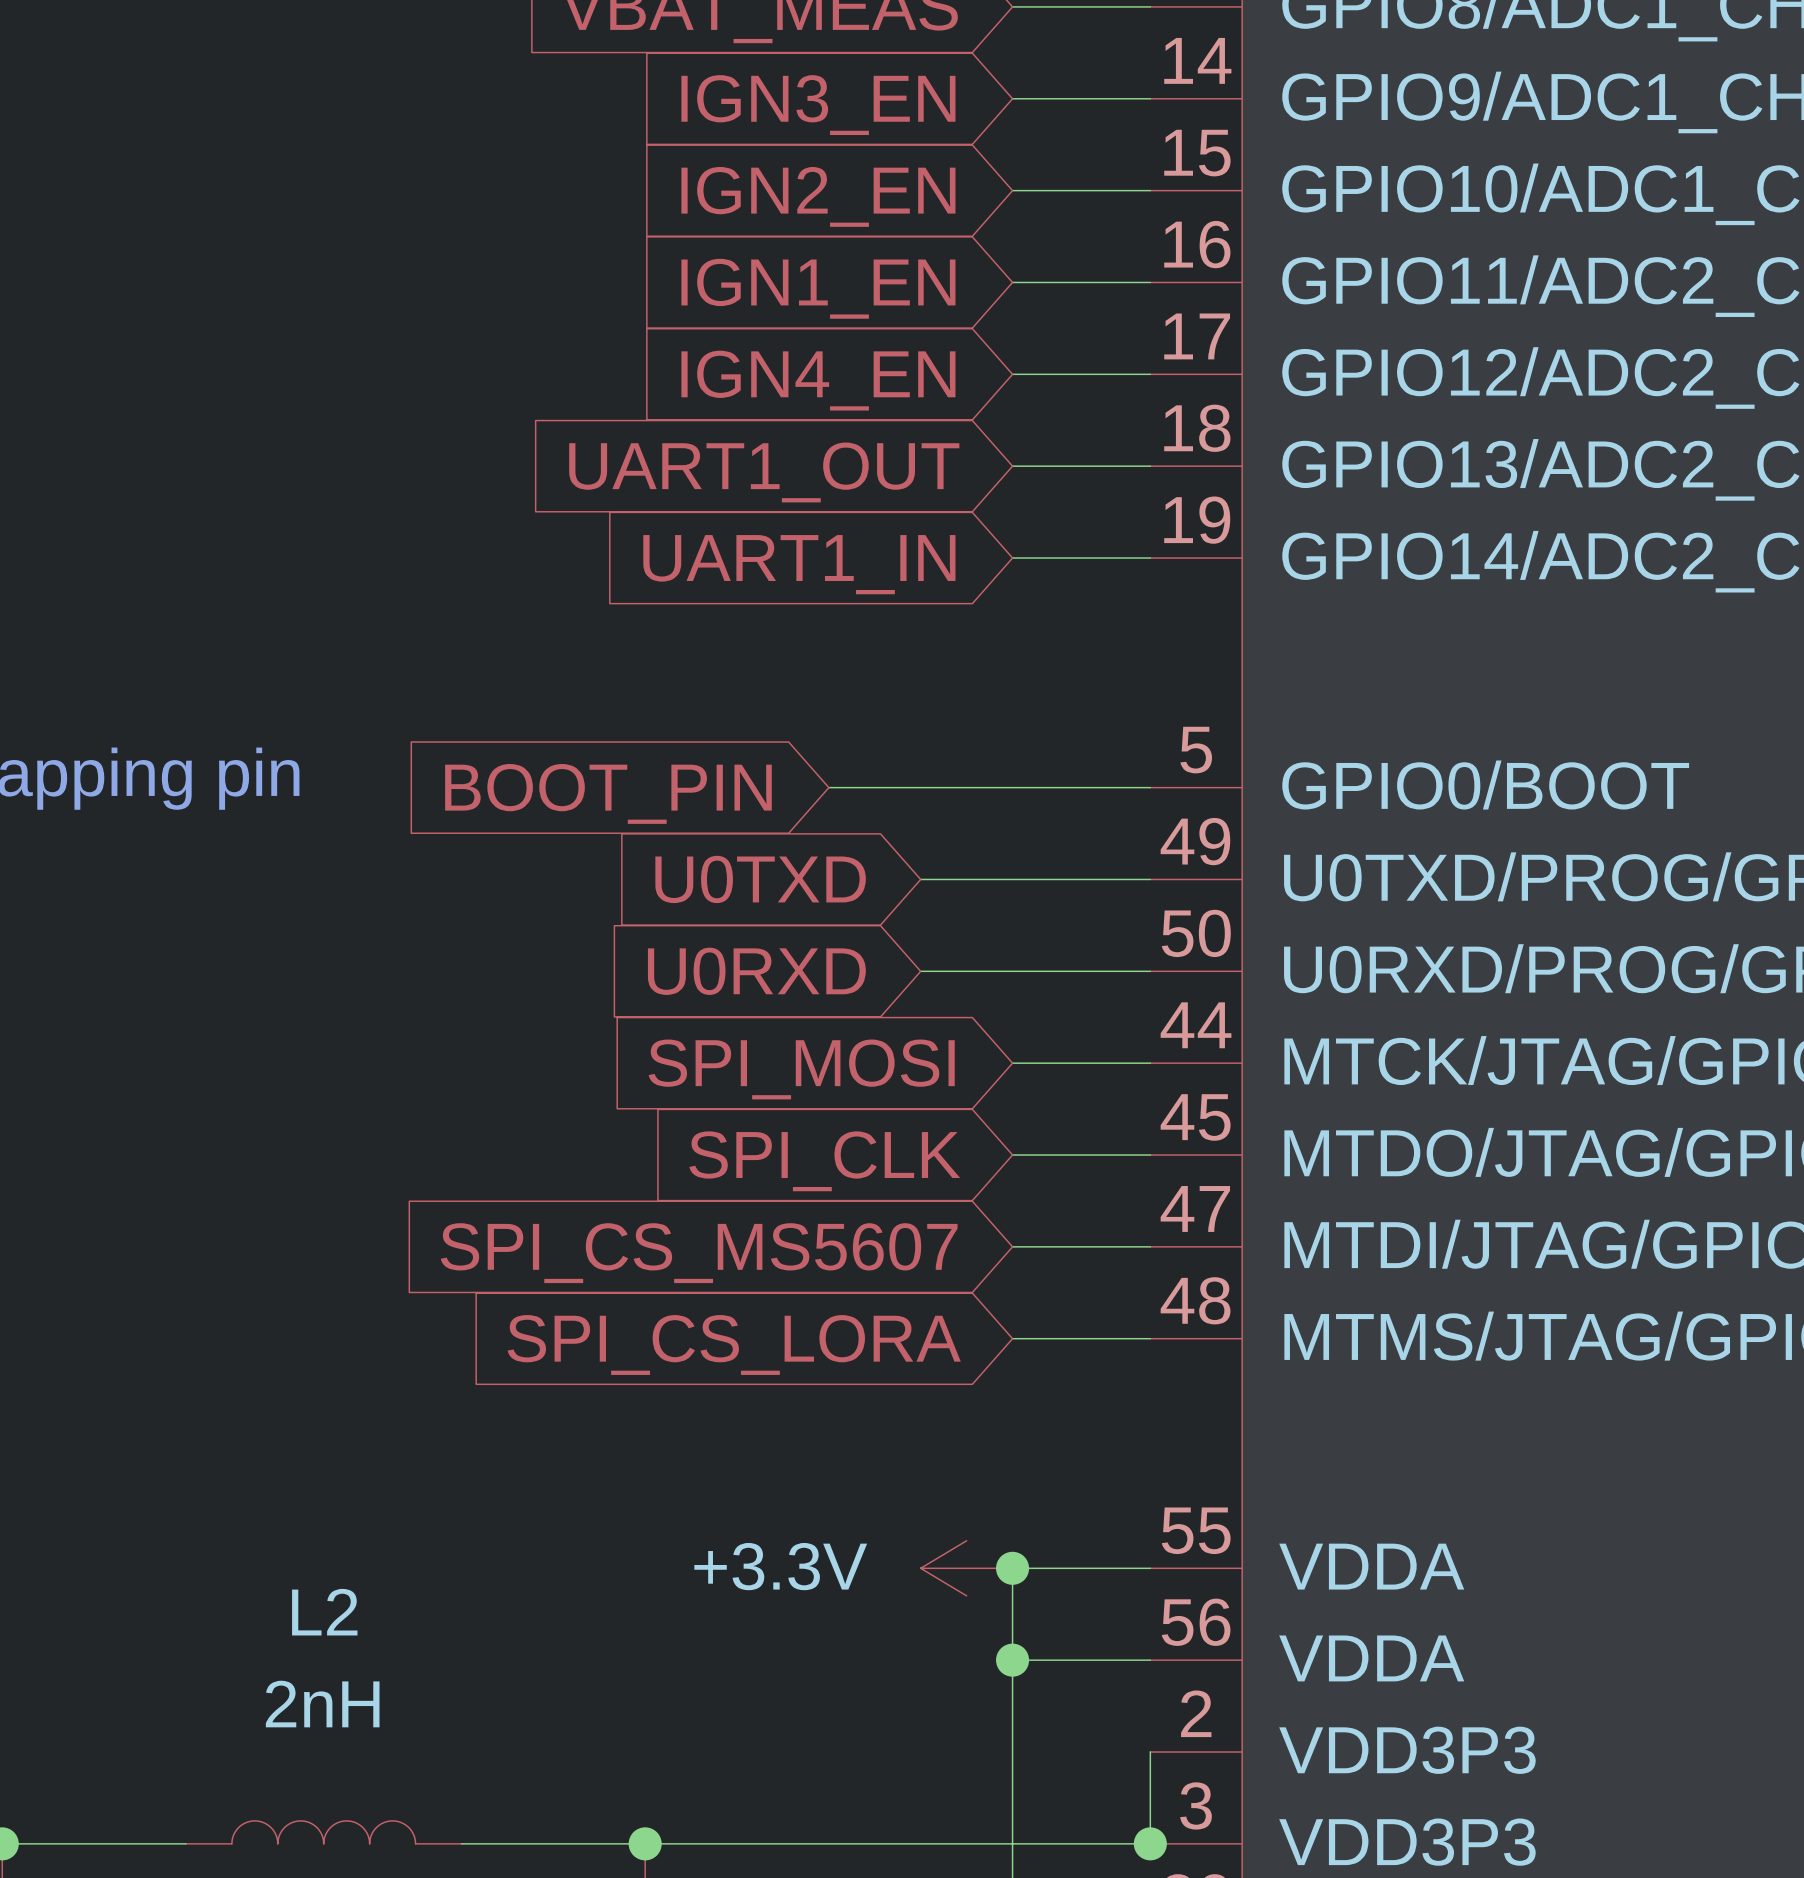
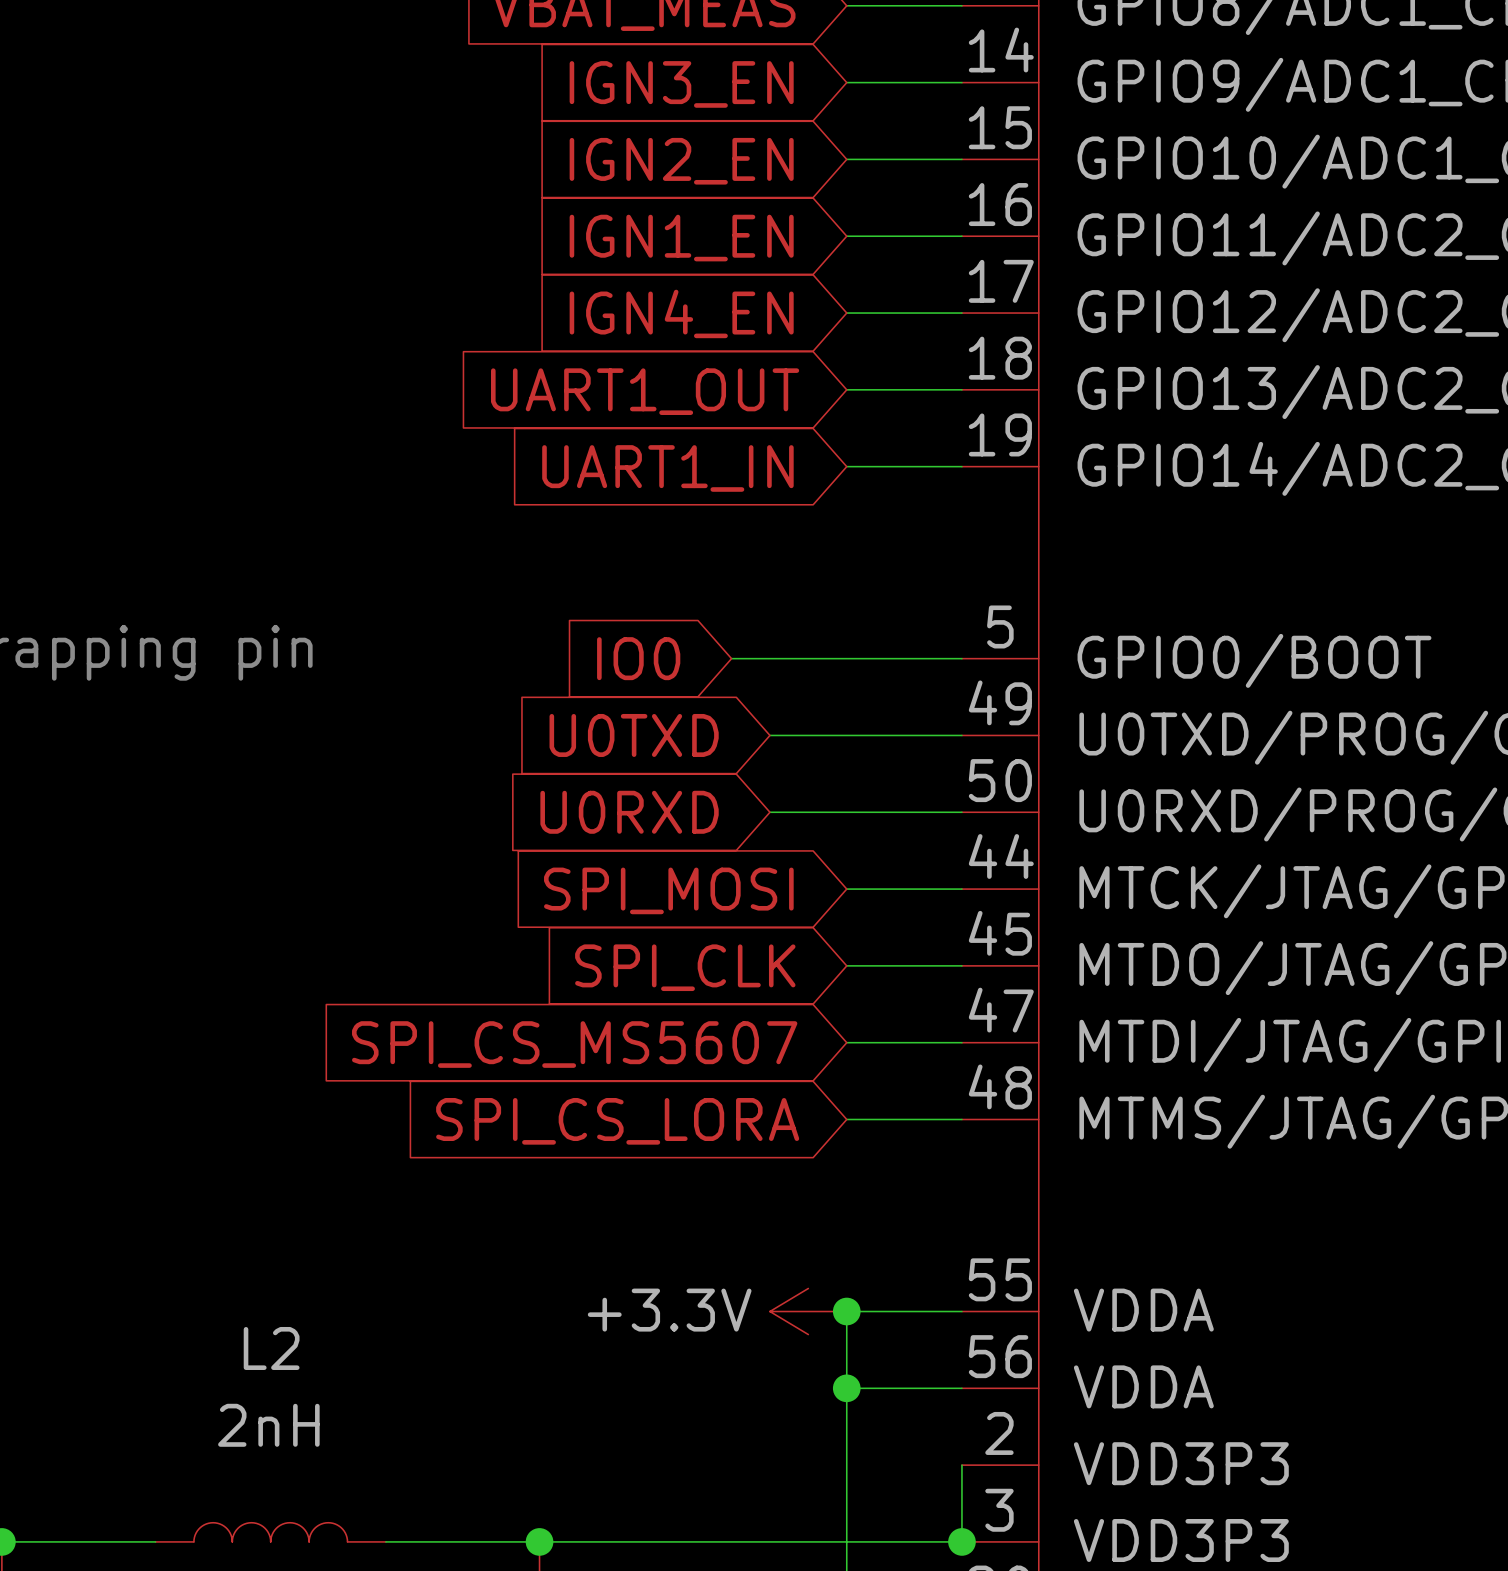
global label: none -> IO0 (638, 658)
wire: (828, 787) (874, 787) -> none
global label: BOOT_PIN (608, 793) -> none

